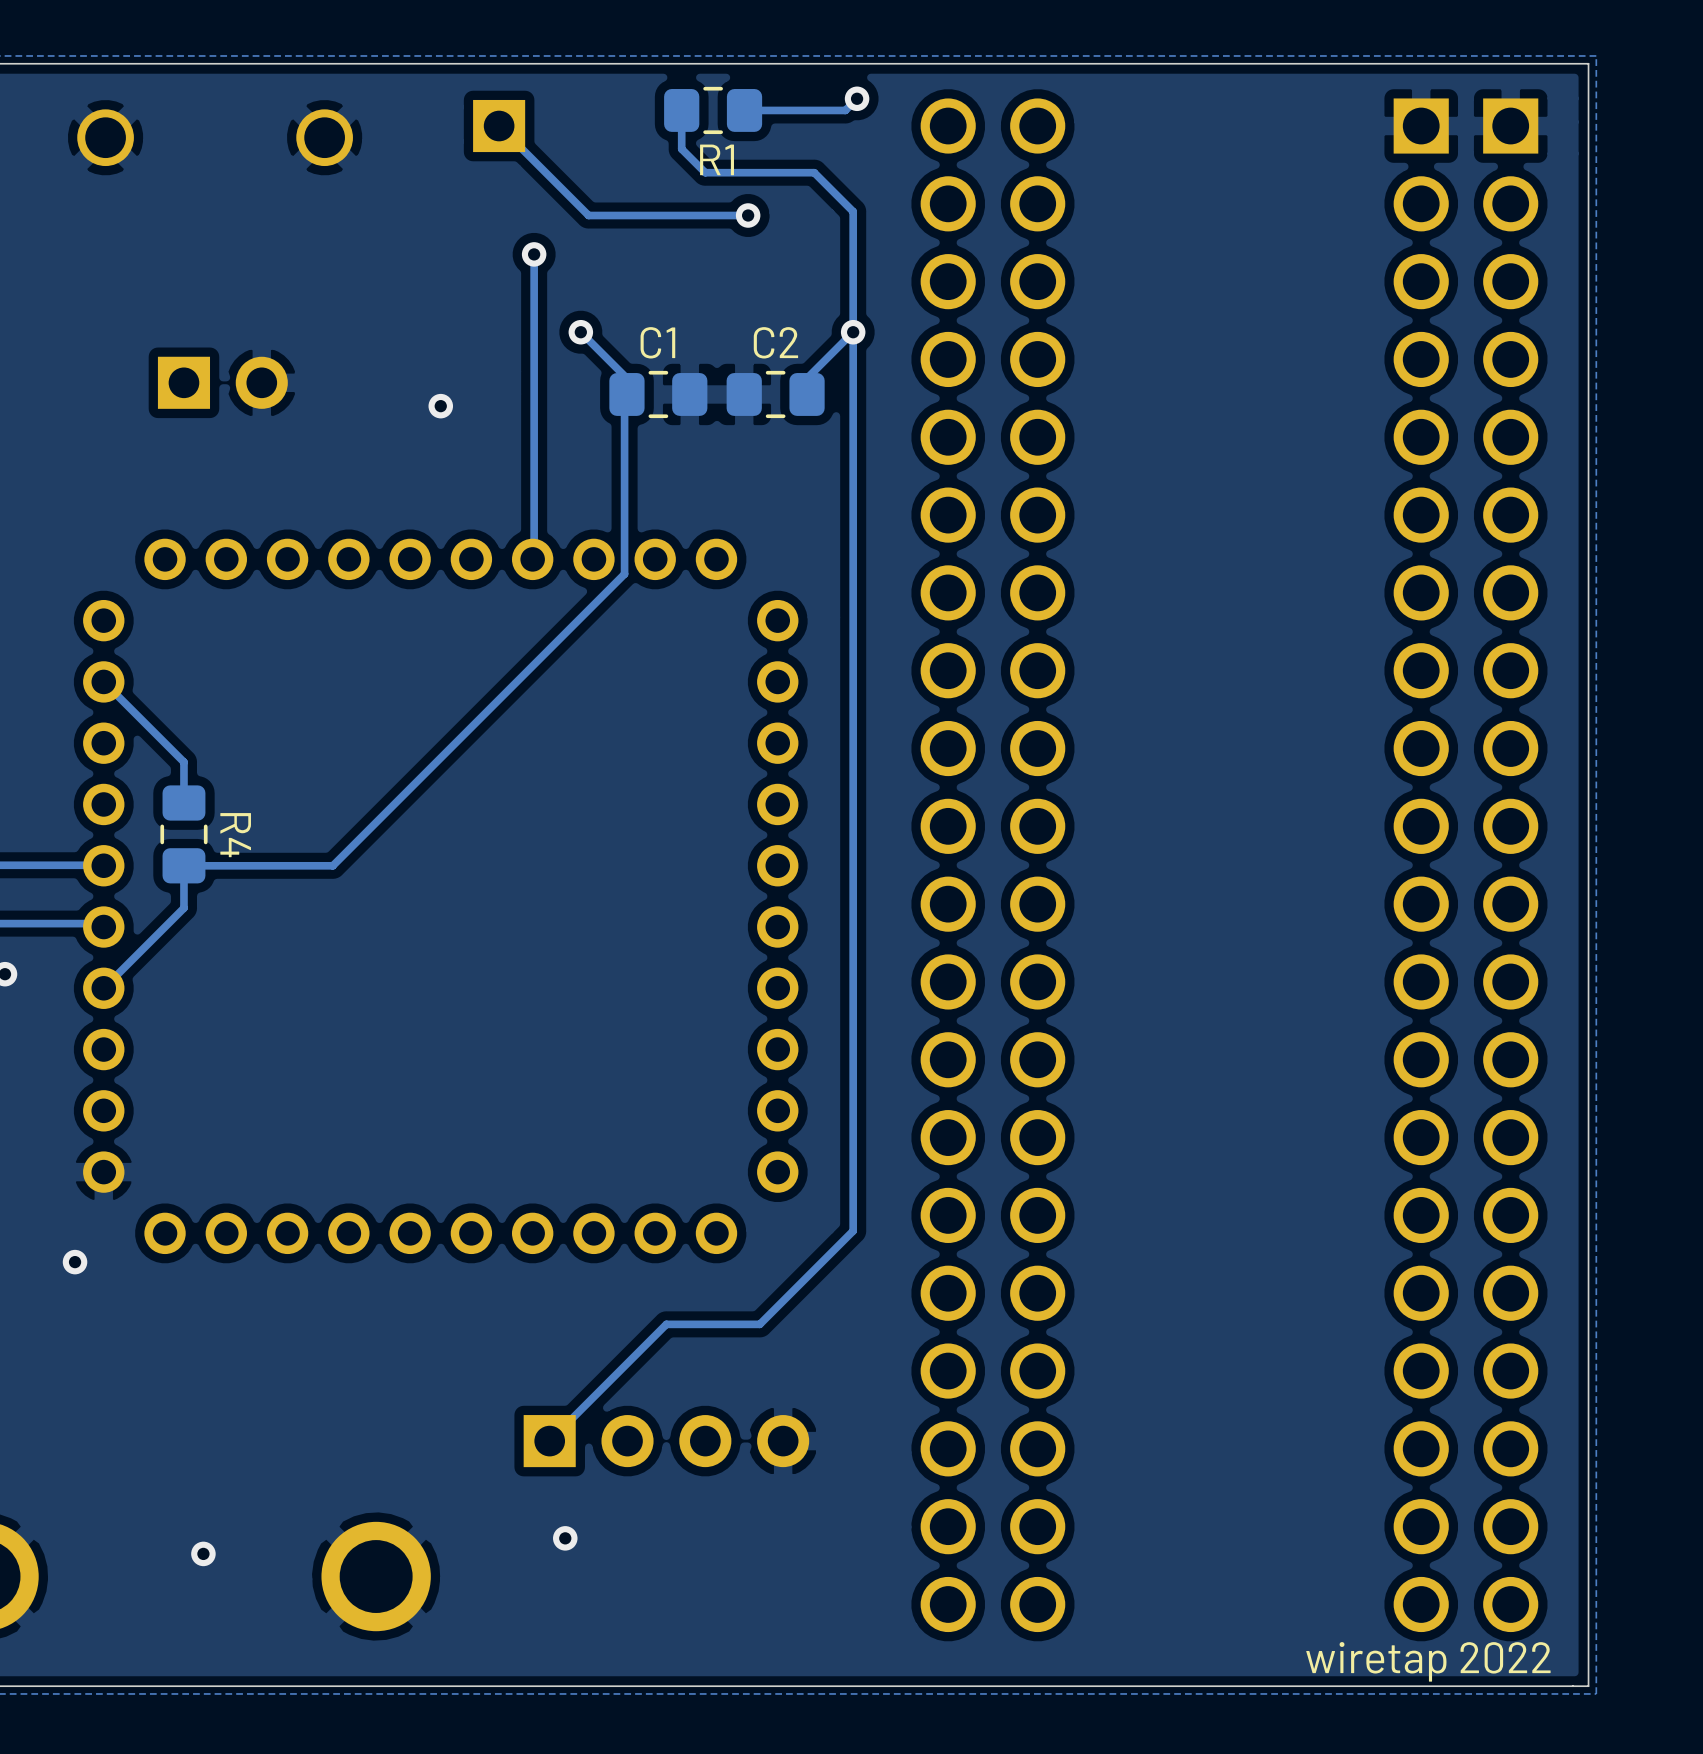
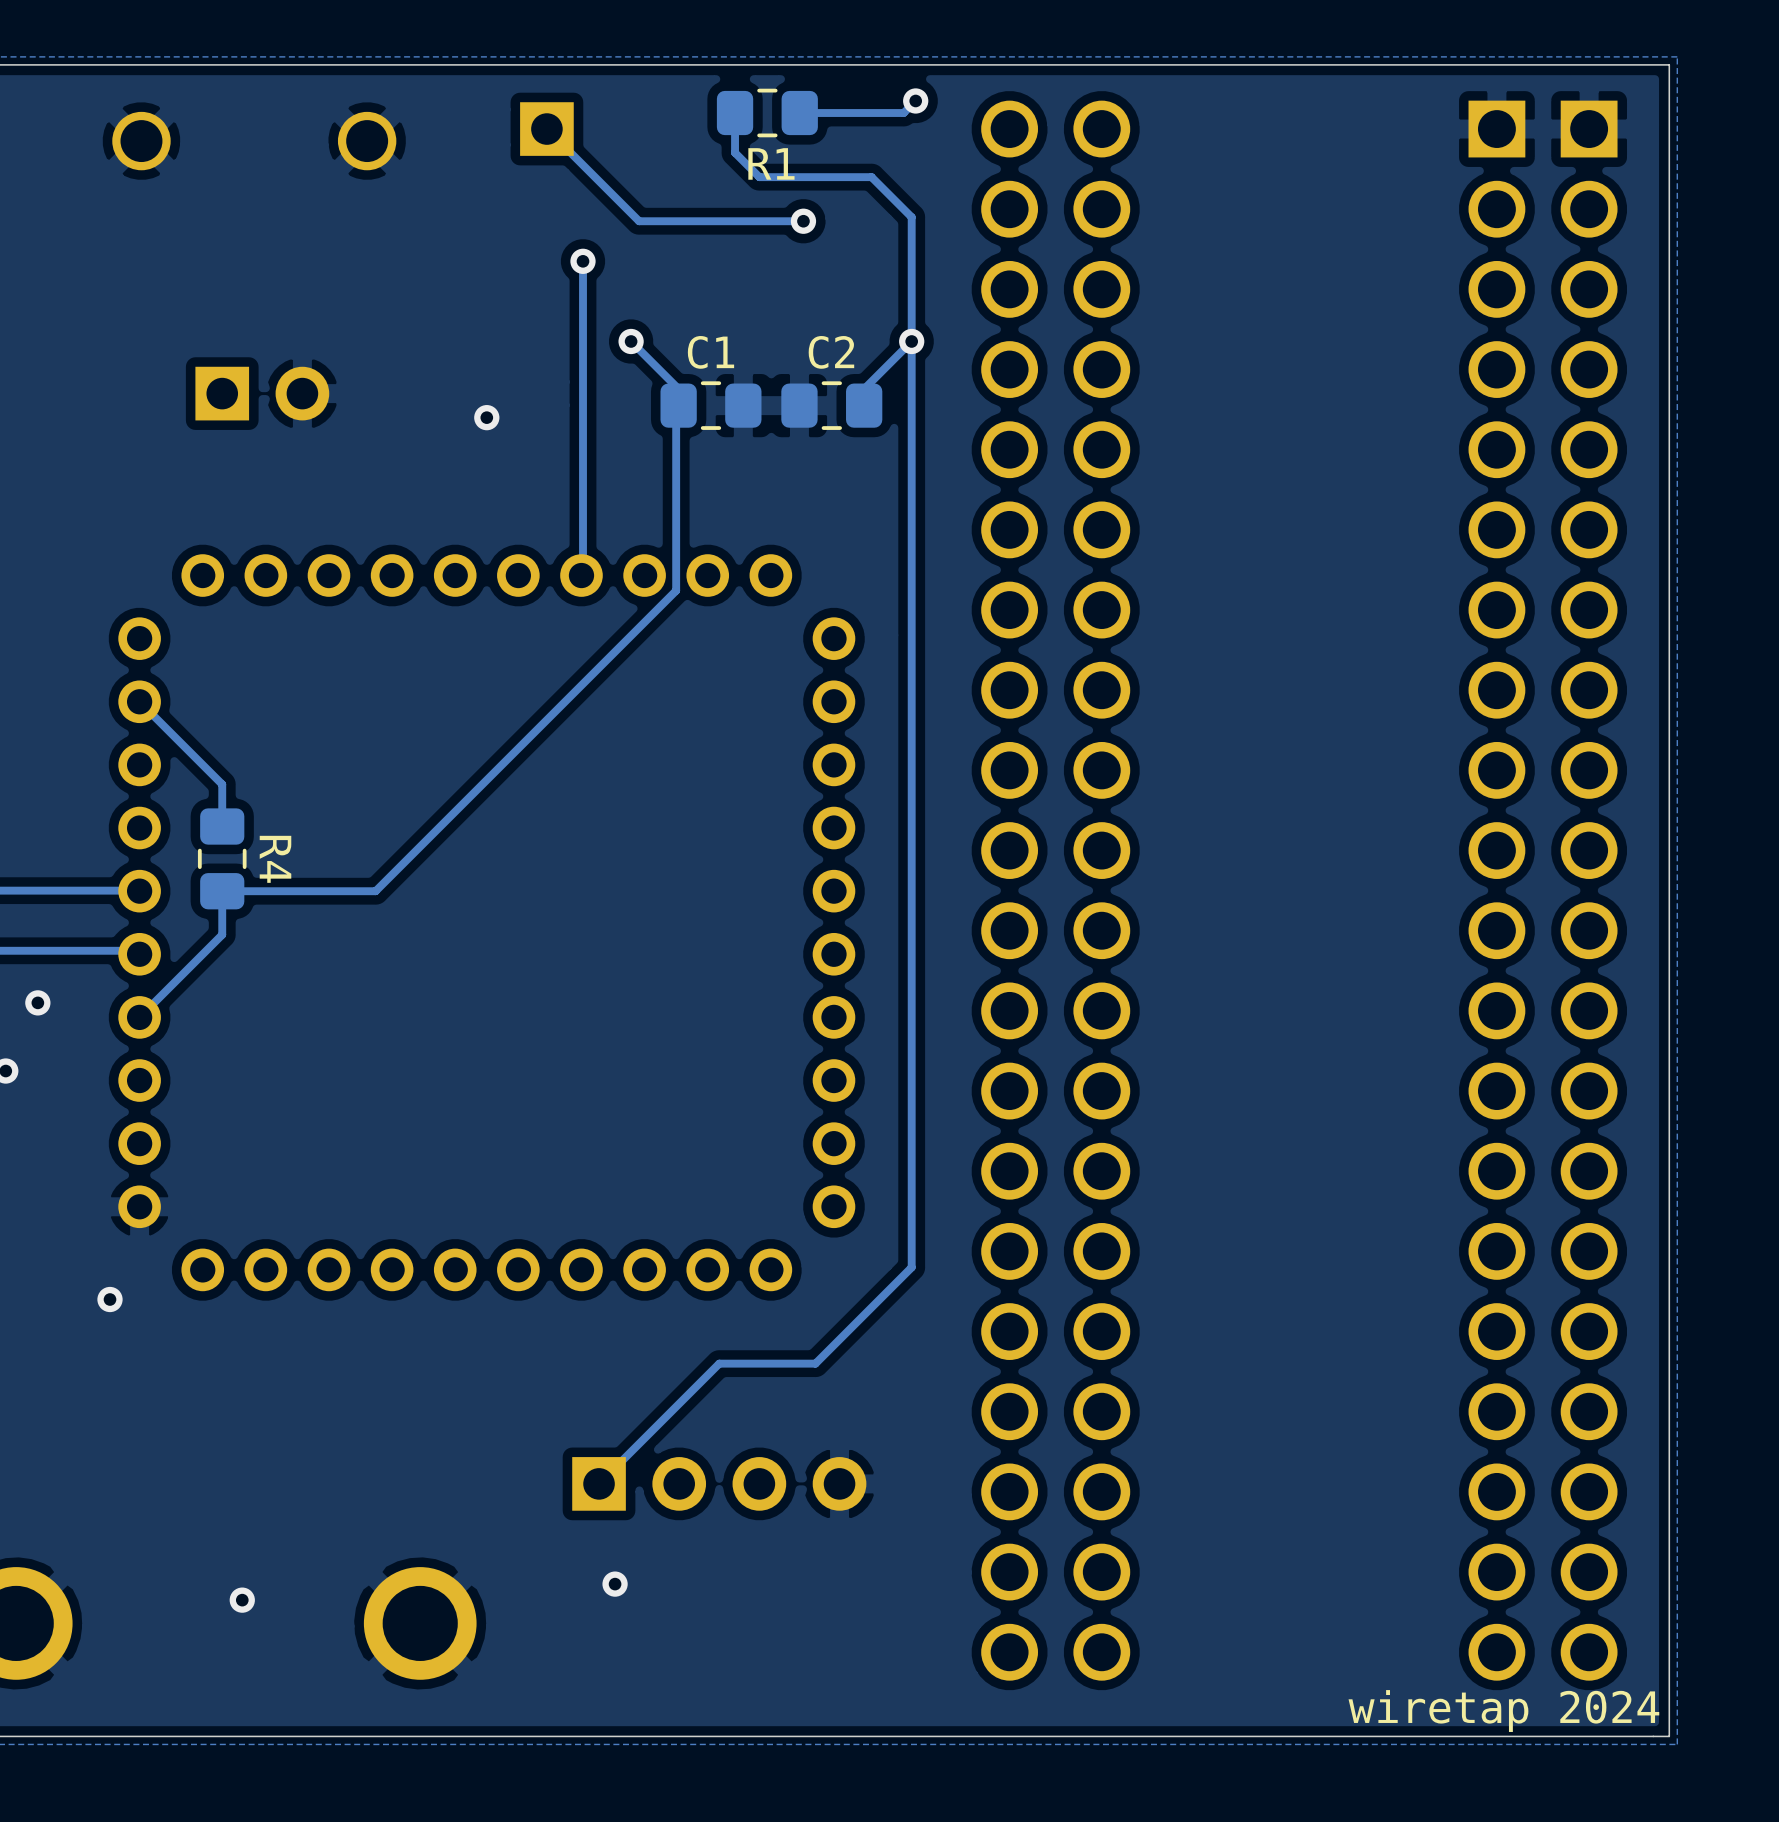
text: wiretap 2022 (1428, 1661) -> wiretap 2024 (1503, 1711)

